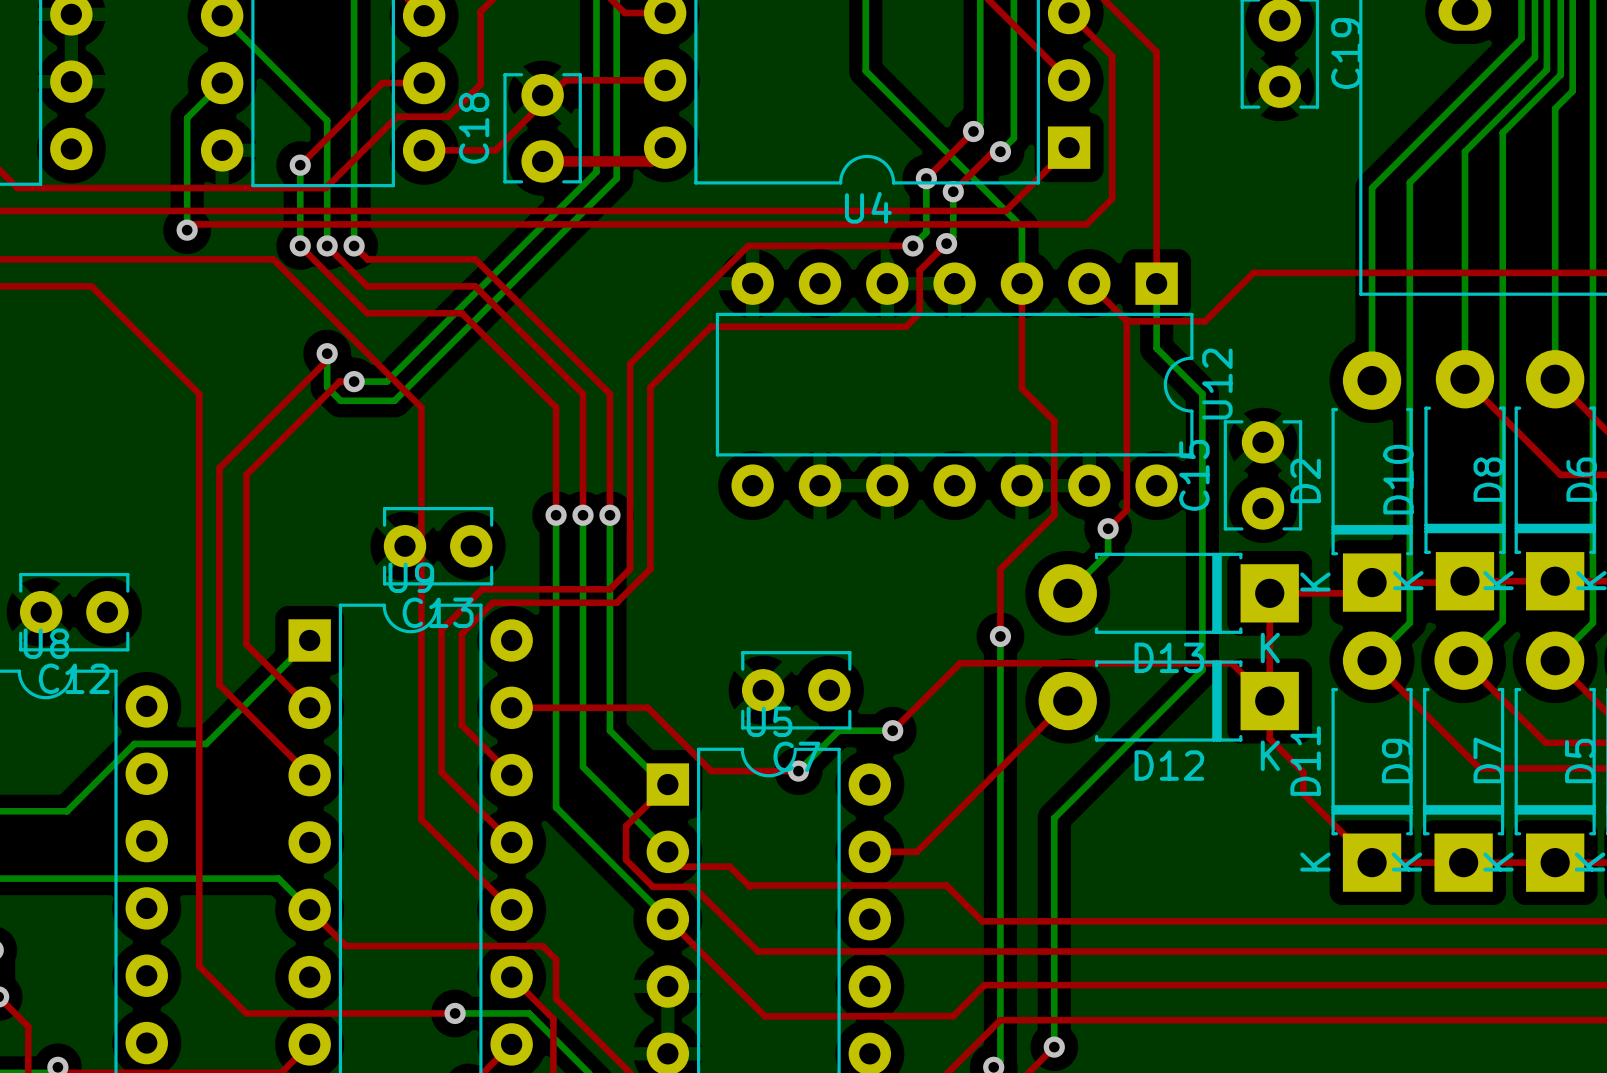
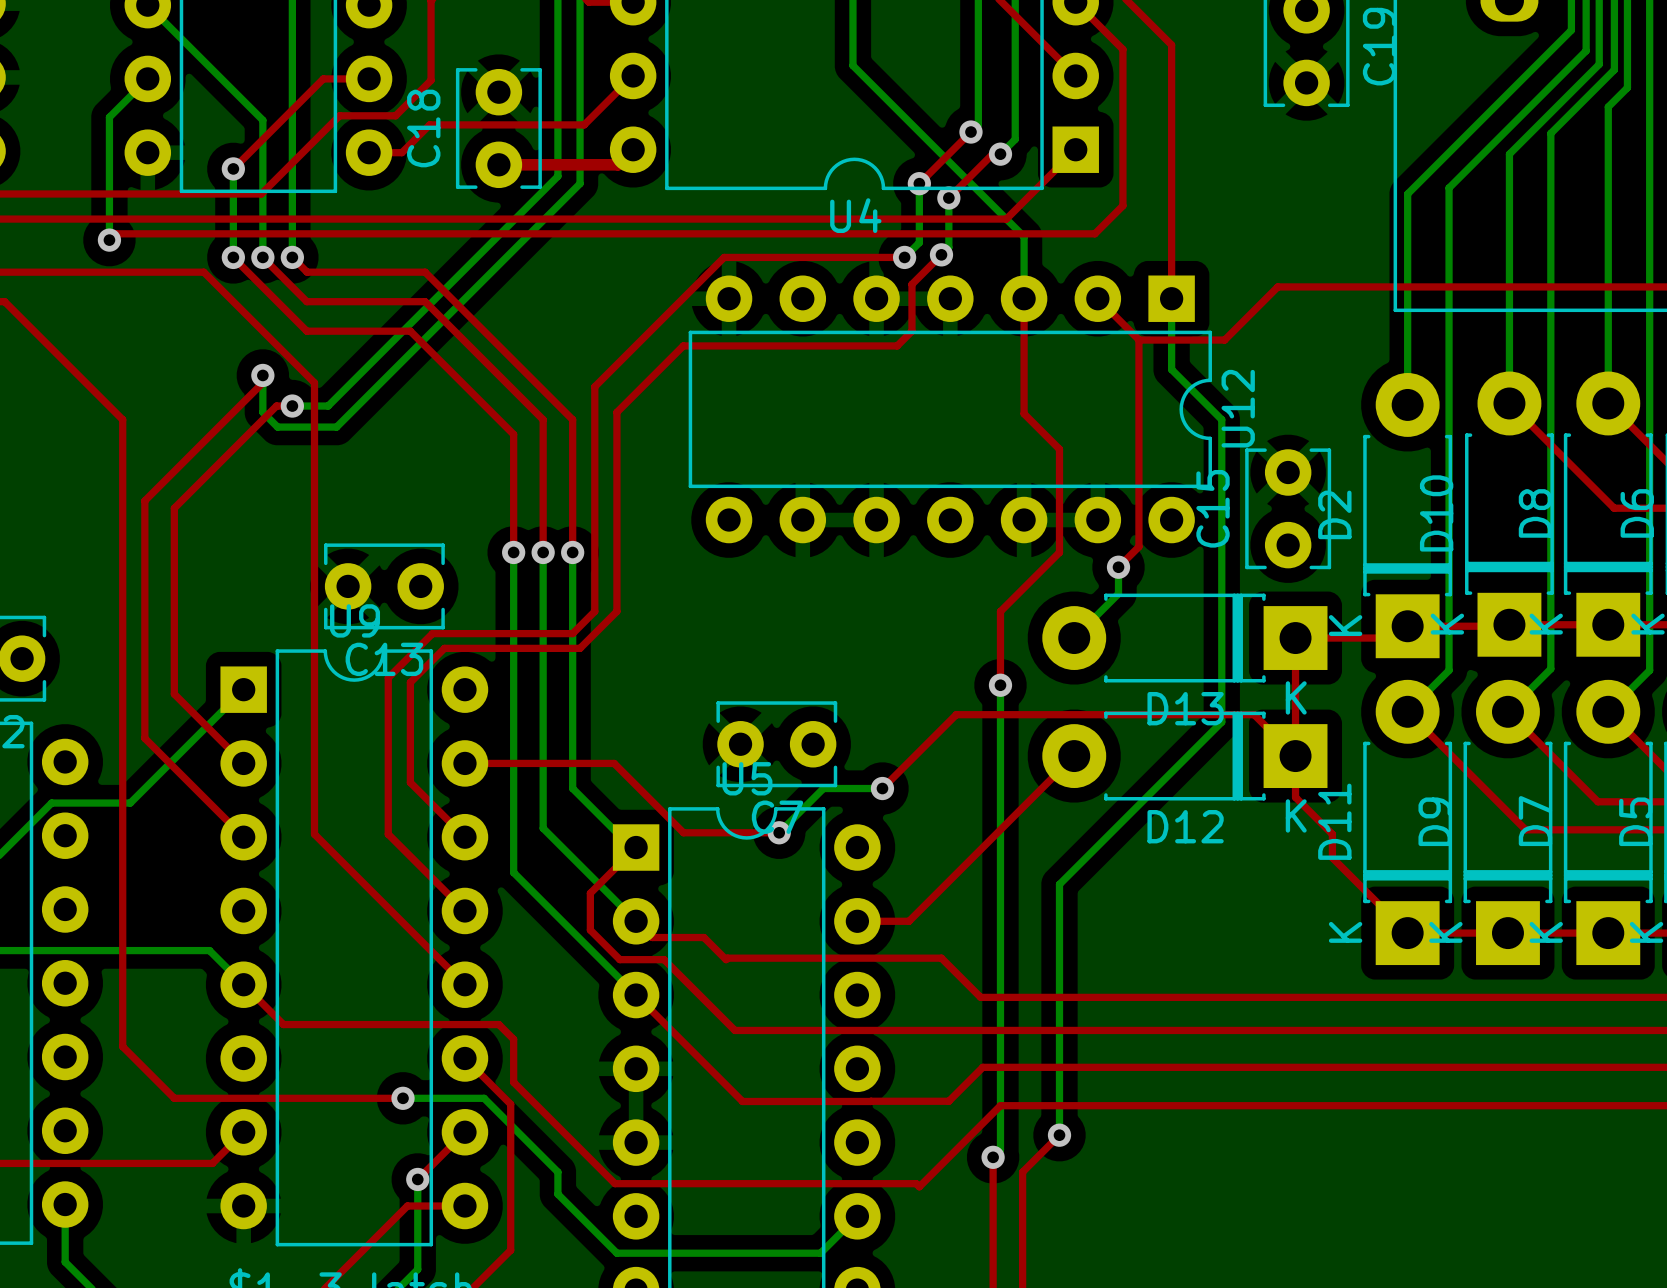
top track: (665, 80) (565, 80) (495, 150) (454, 150) -> (633, 75) (584, 124) (429, 124) (401, 152)
top track: (374, 360) (421, 407) (421, 819) -> (314, 382) (314, 834) (366, 885)

